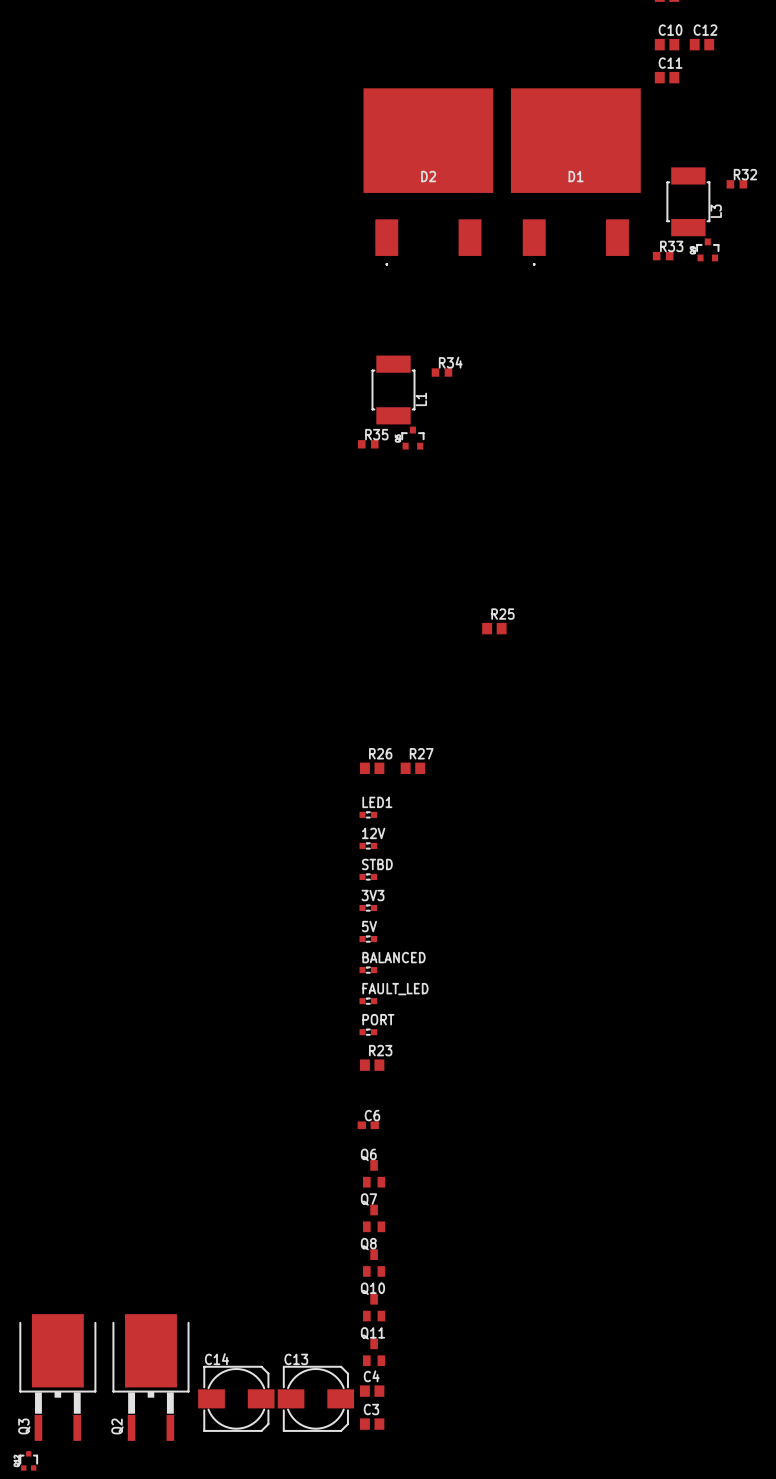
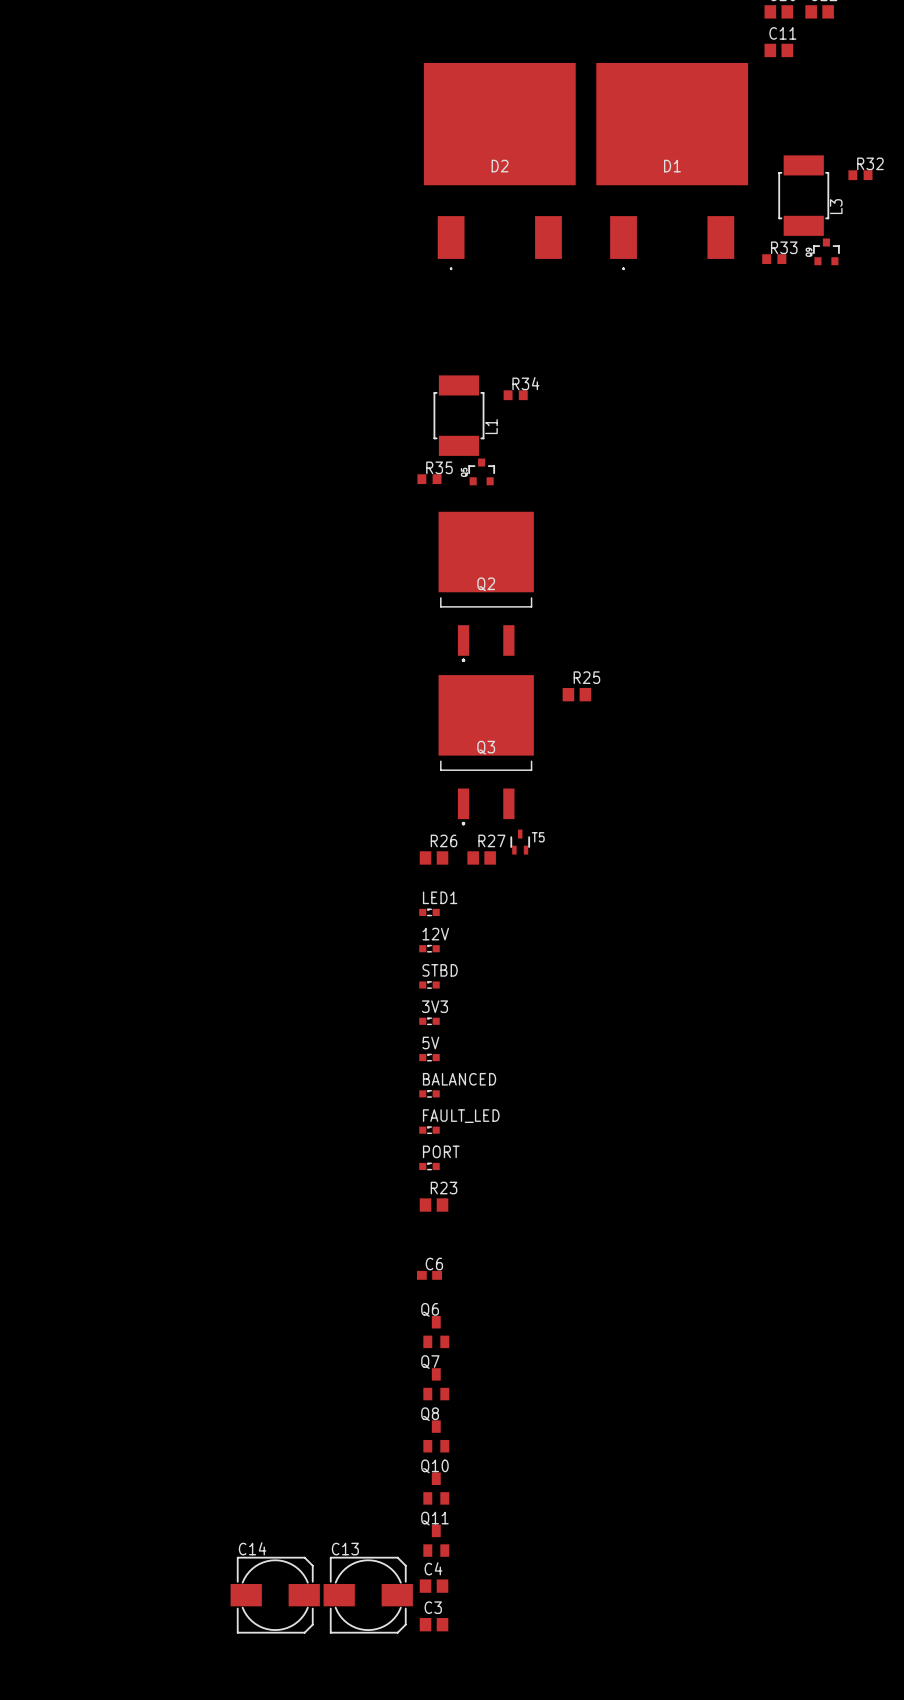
T5: none -> (520, 842)
Q3 footprint: [19, 1314, 97, 1441] -> [438, 675, 534, 826]
Q2 footprint: [112, 1314, 190, 1441] -> [438, 511, 534, 663]
Q3 name position: Q3 (24, 1426) -> Q3 (486, 747)
Q2 name position: Q2 (117, 1426) -> Q2 (486, 584)
part: (28, 1460) -> none

